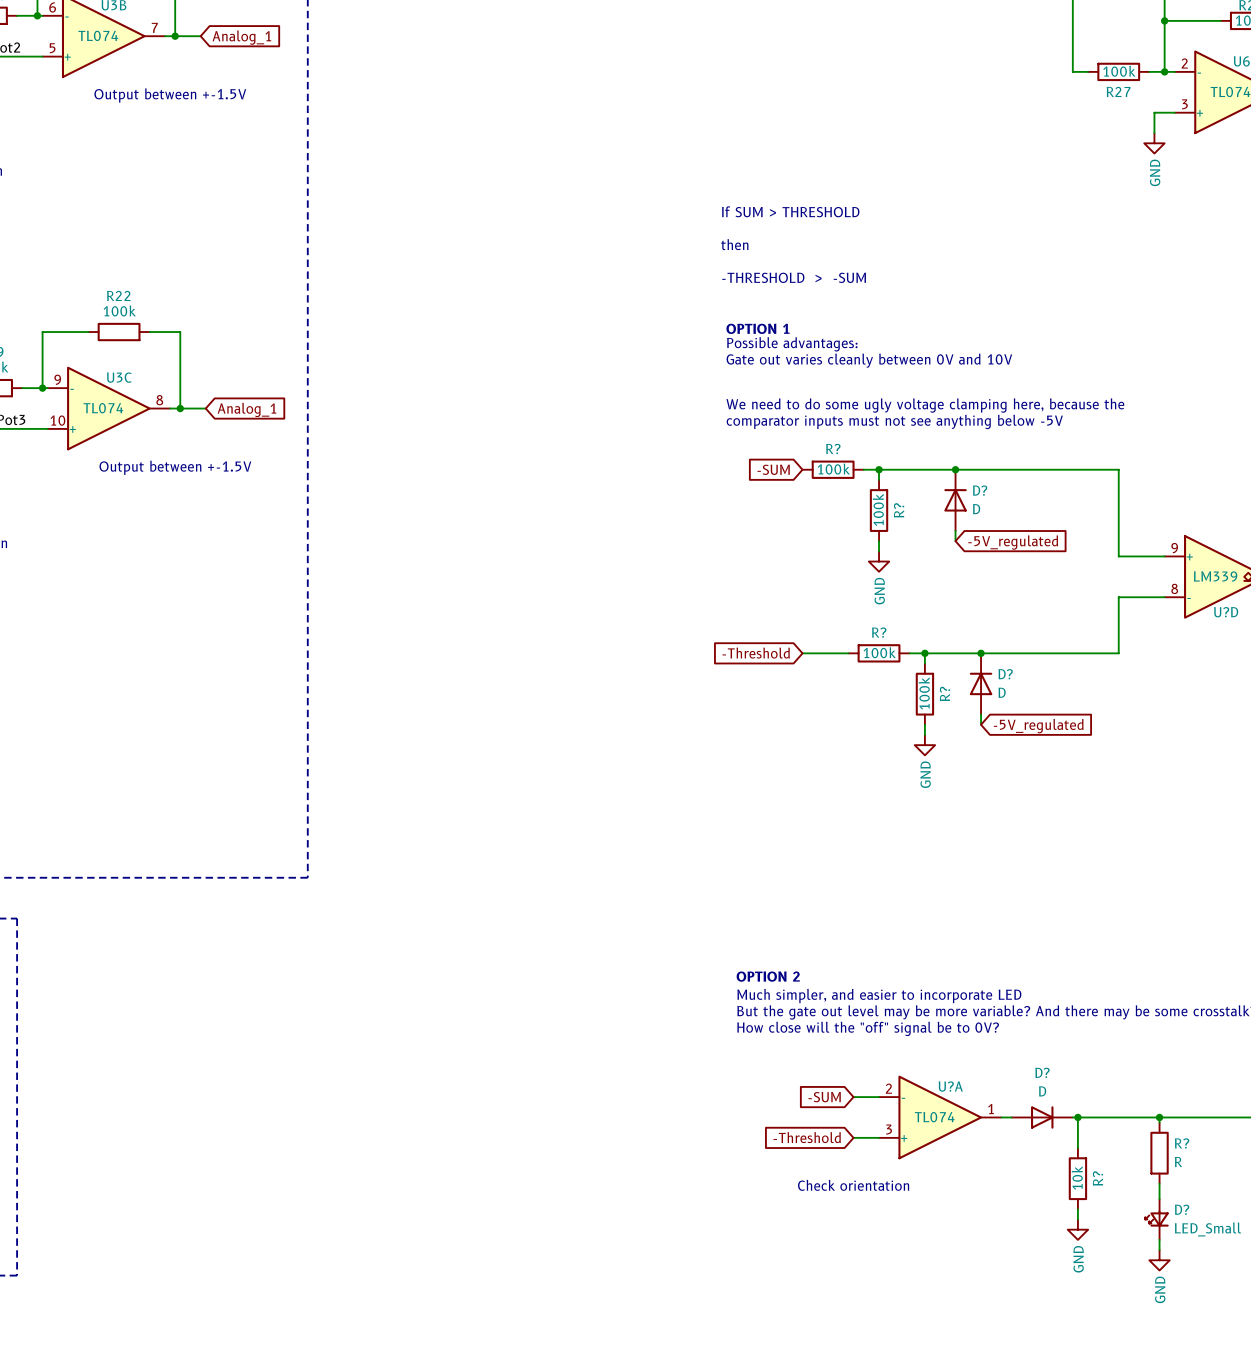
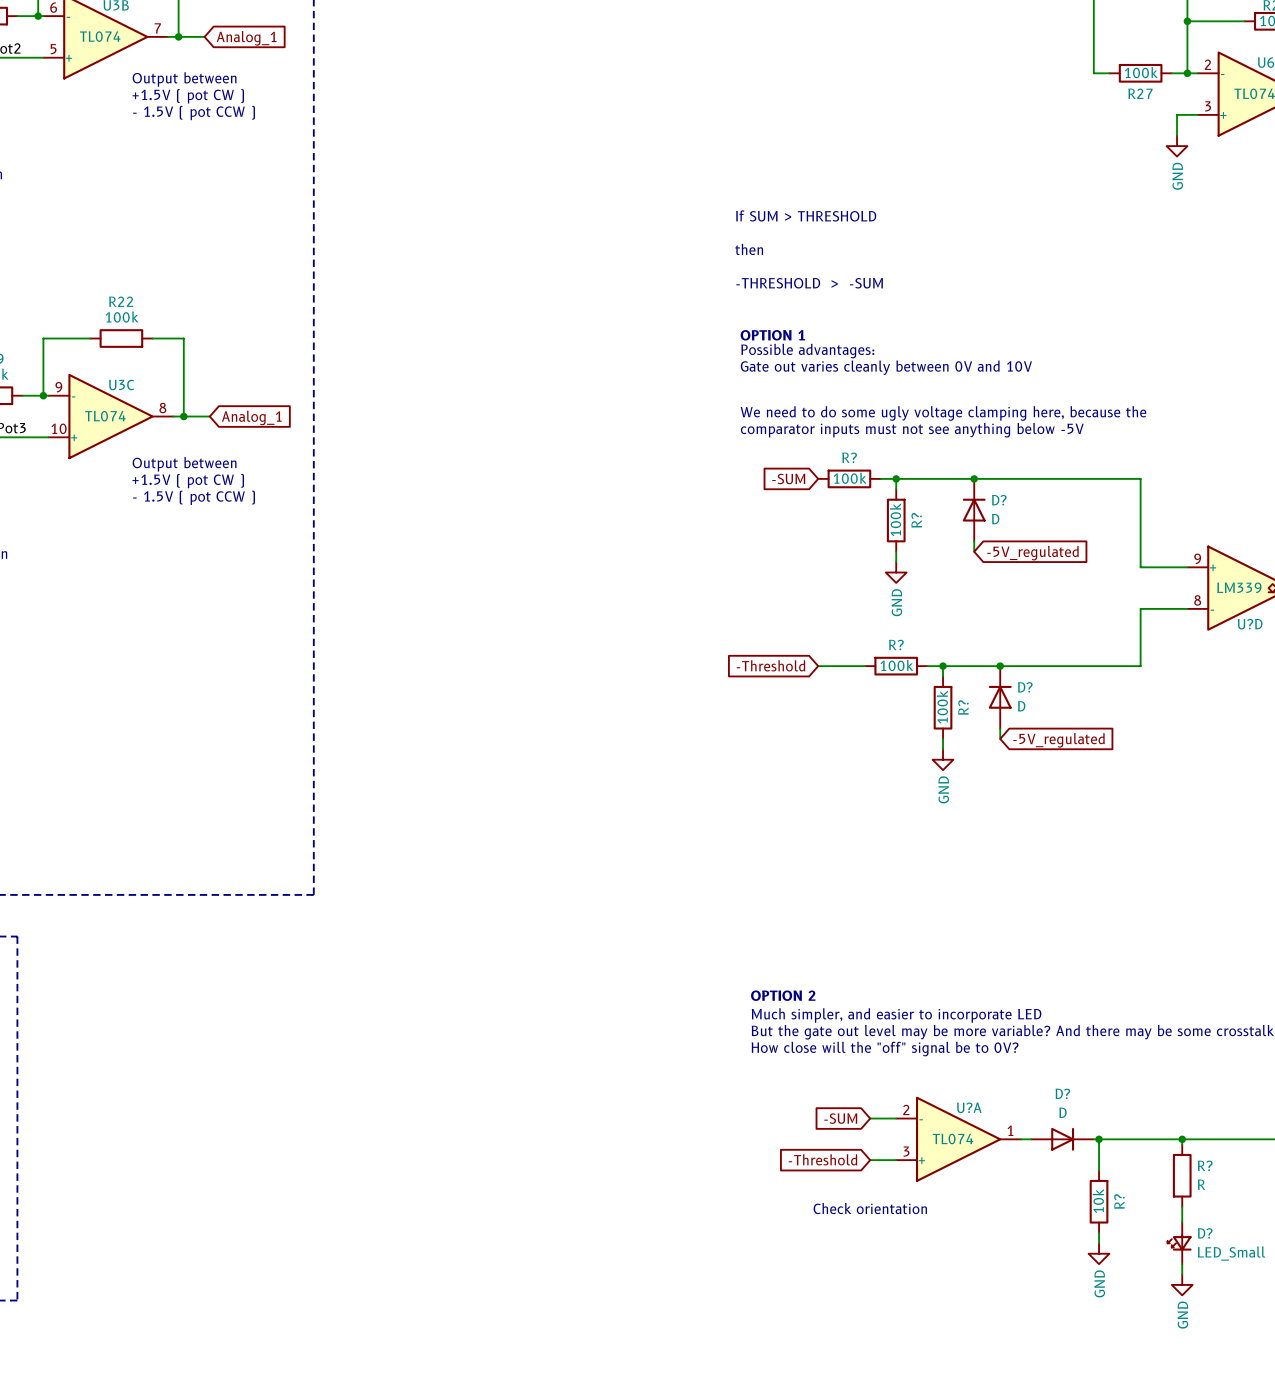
text: none -> +1.5V ( pot CW ) (188, 96)
text: Output between +-1.5V (170, 95) -> Output between (184, 79)
text: none -> - 1.5V ( pot CCW ) (194, 113)
text: Output between +-1.5V (175, 467) -> Output between (184, 464)
text: none -> +1.5V ( pot CW ) (188, 481)
text: none -> - 1.5V ( pot CCW ) (194, 497)

